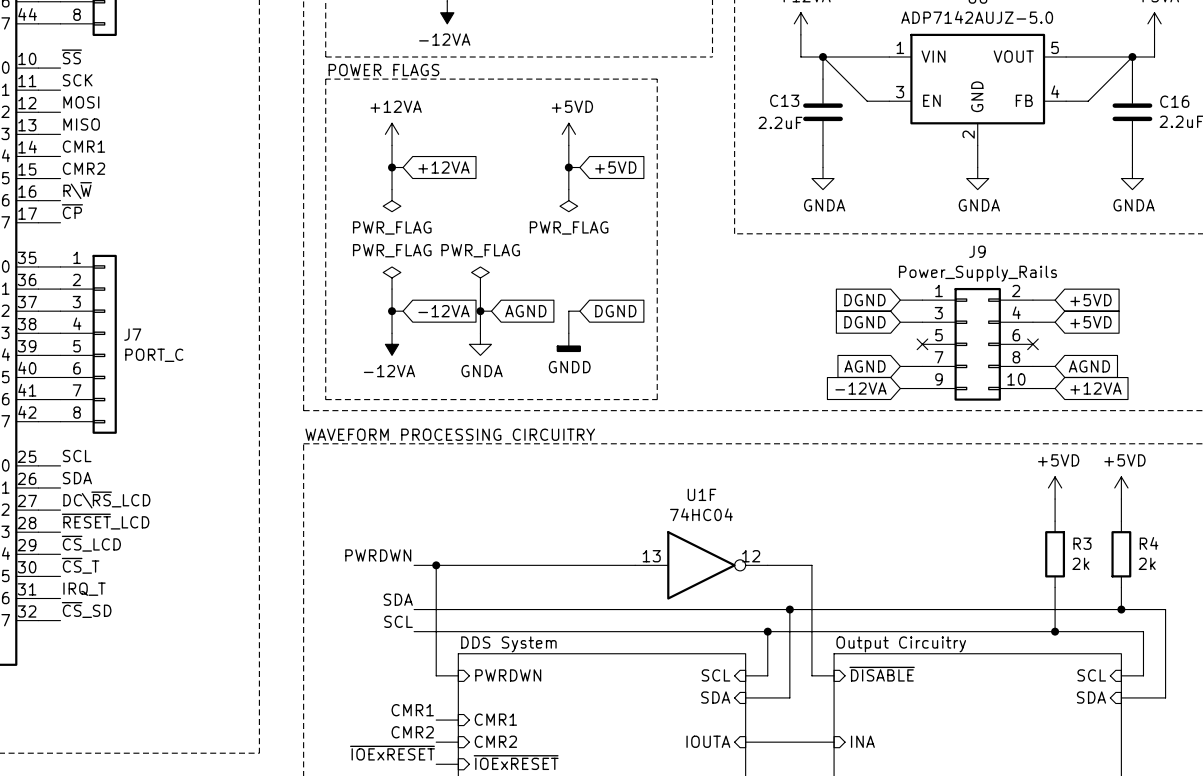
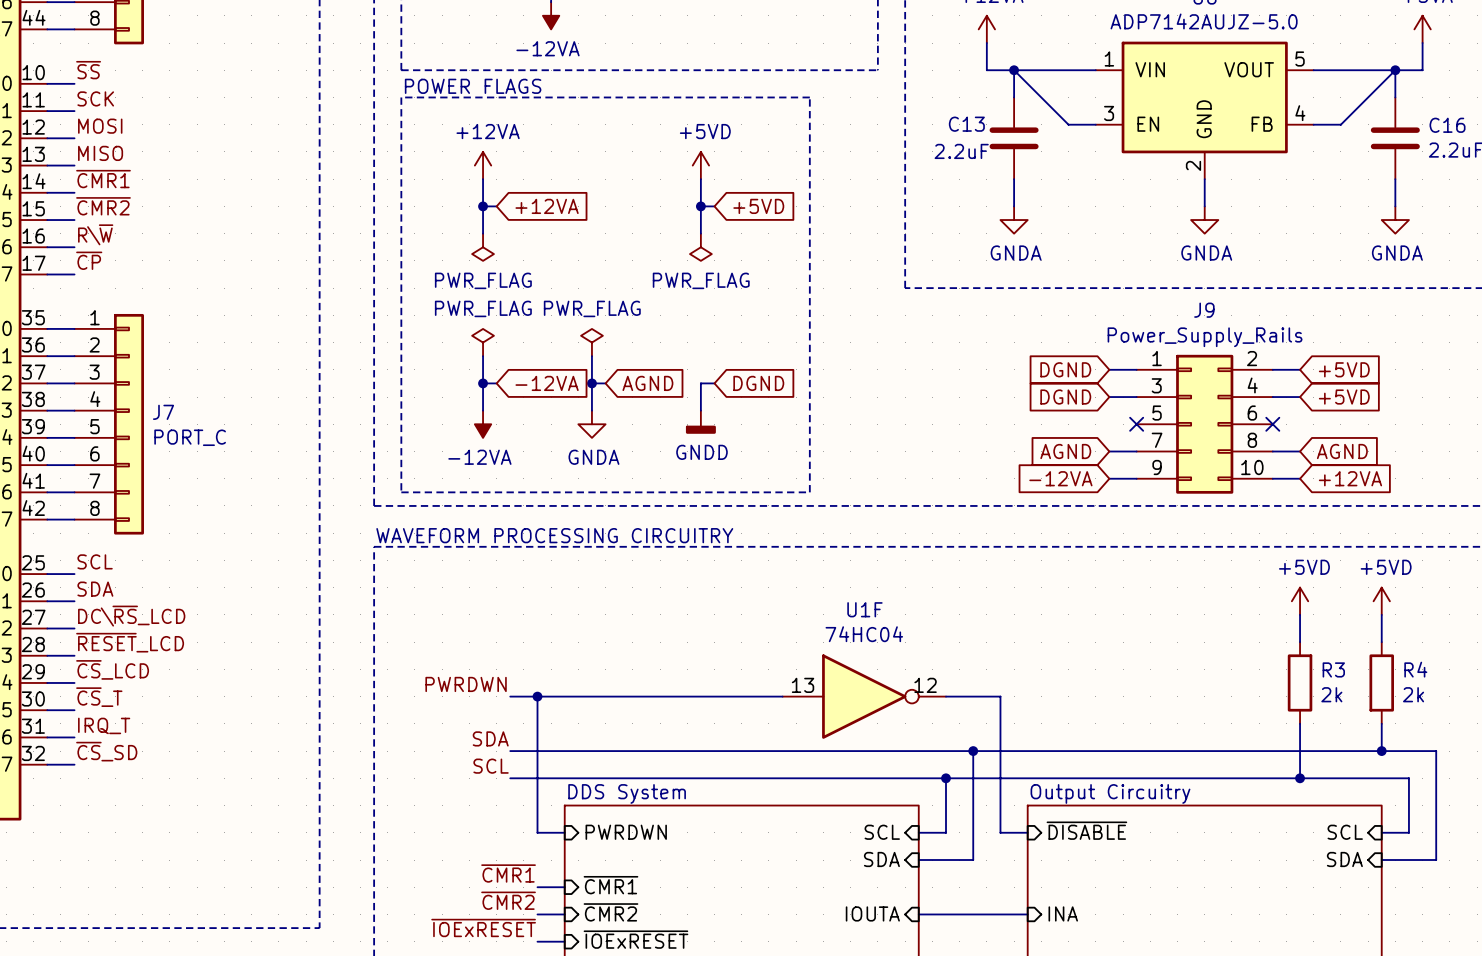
label: CMR1 (83, 146) -> ~{CMR1} (103, 179)
label: CMR2 (83, 168) -> ~{CMR2} (103, 206)
label: CMR1 (412, 710) -> ~{CMR1} (508, 873)
sheet pin: CMR1 (495, 719) -> ~{CMR1} (610, 885)
label: CMR2 (412, 732) -> ~{CMR2} (508, 900)
sheet pin: CMR2 (495, 741) -> ~{CMR2} (610, 912)

